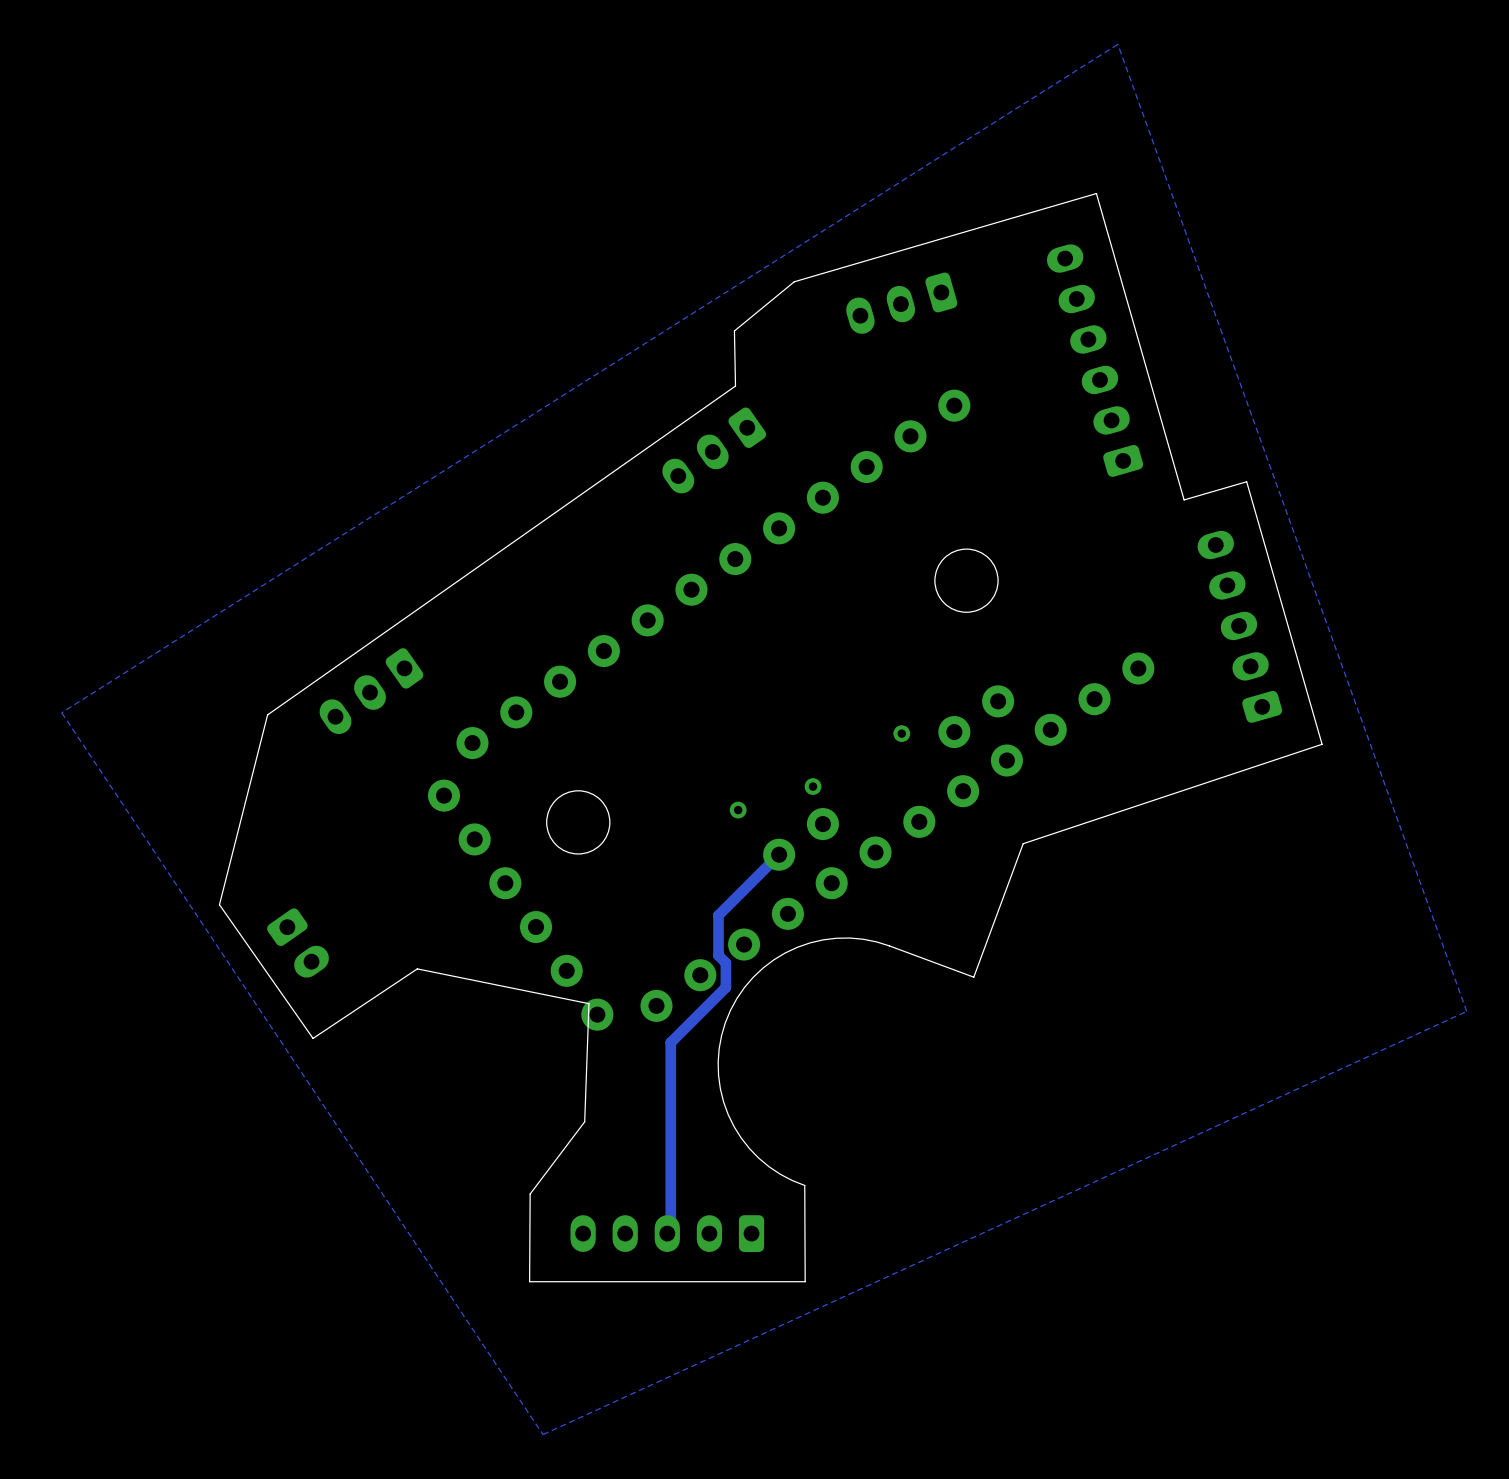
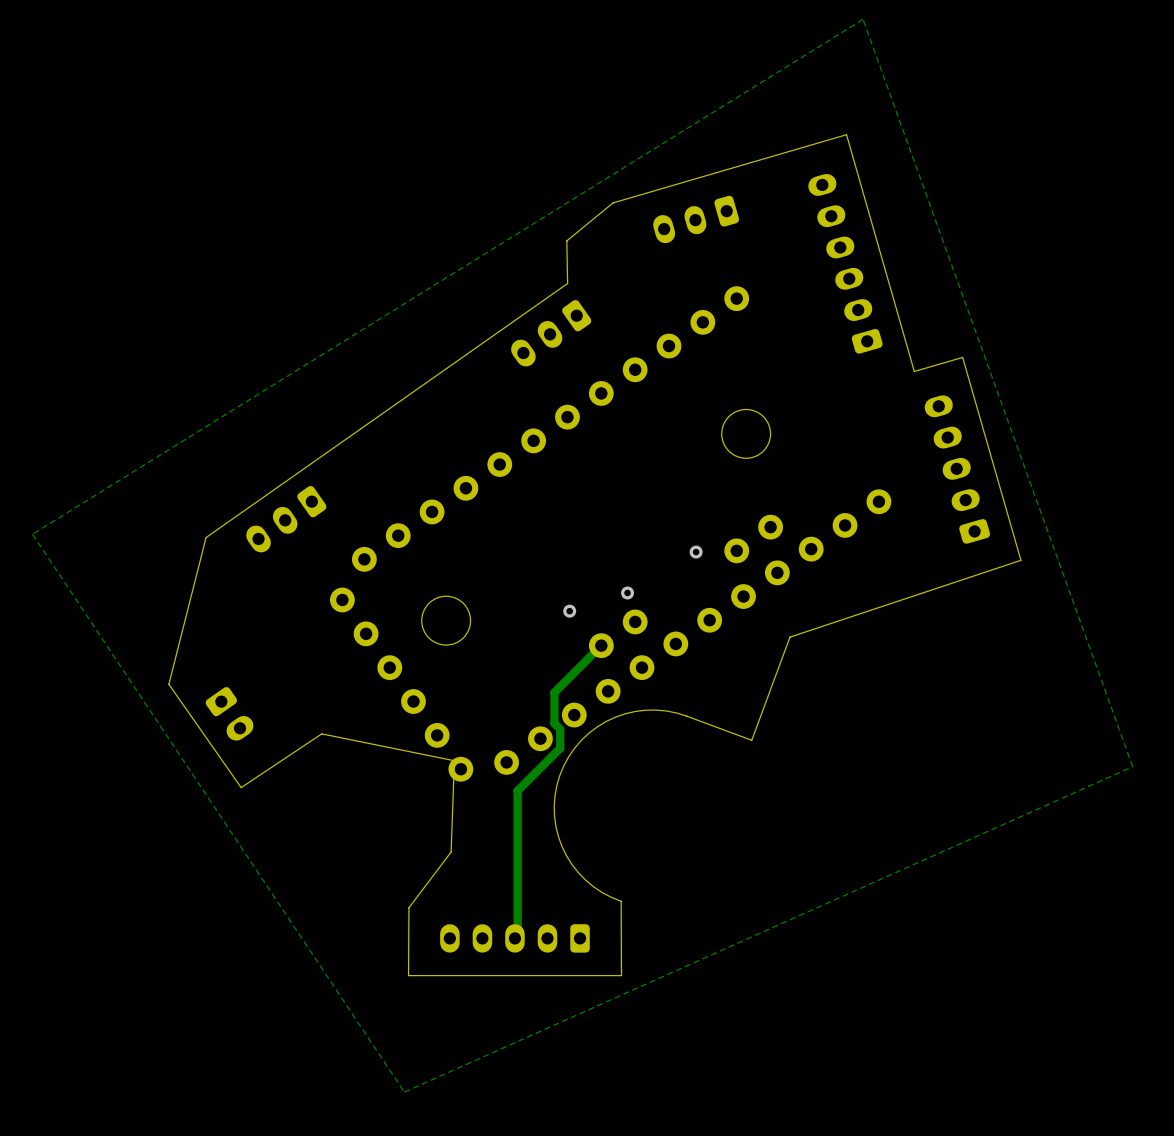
zone outline: (1117, 44) (61, 712) (542, 1434) (1466, 1011) -> (863, 19) (32, 534) (404, 1092) (1132, 766)

